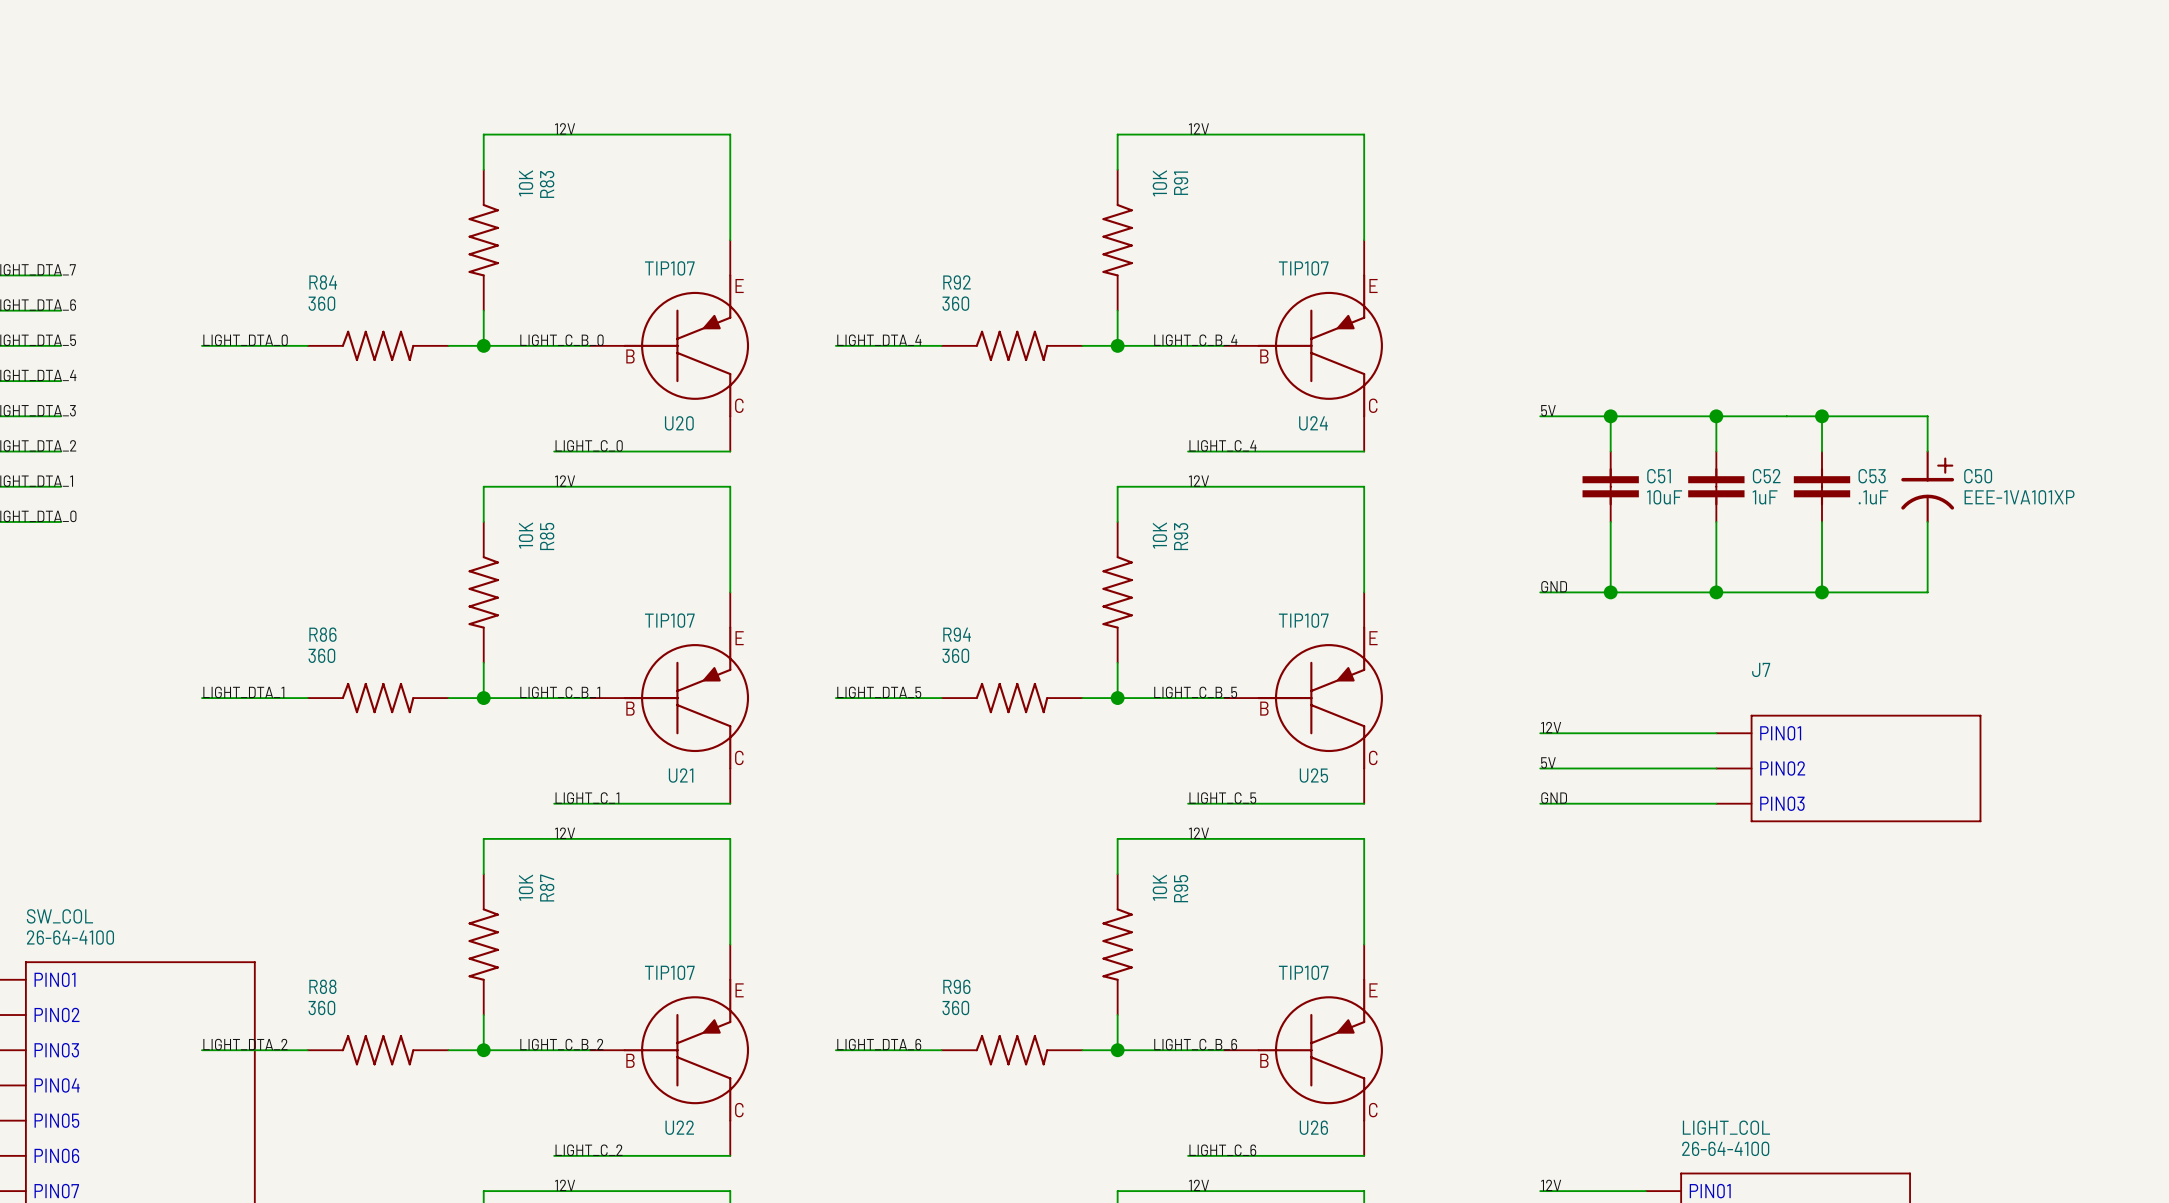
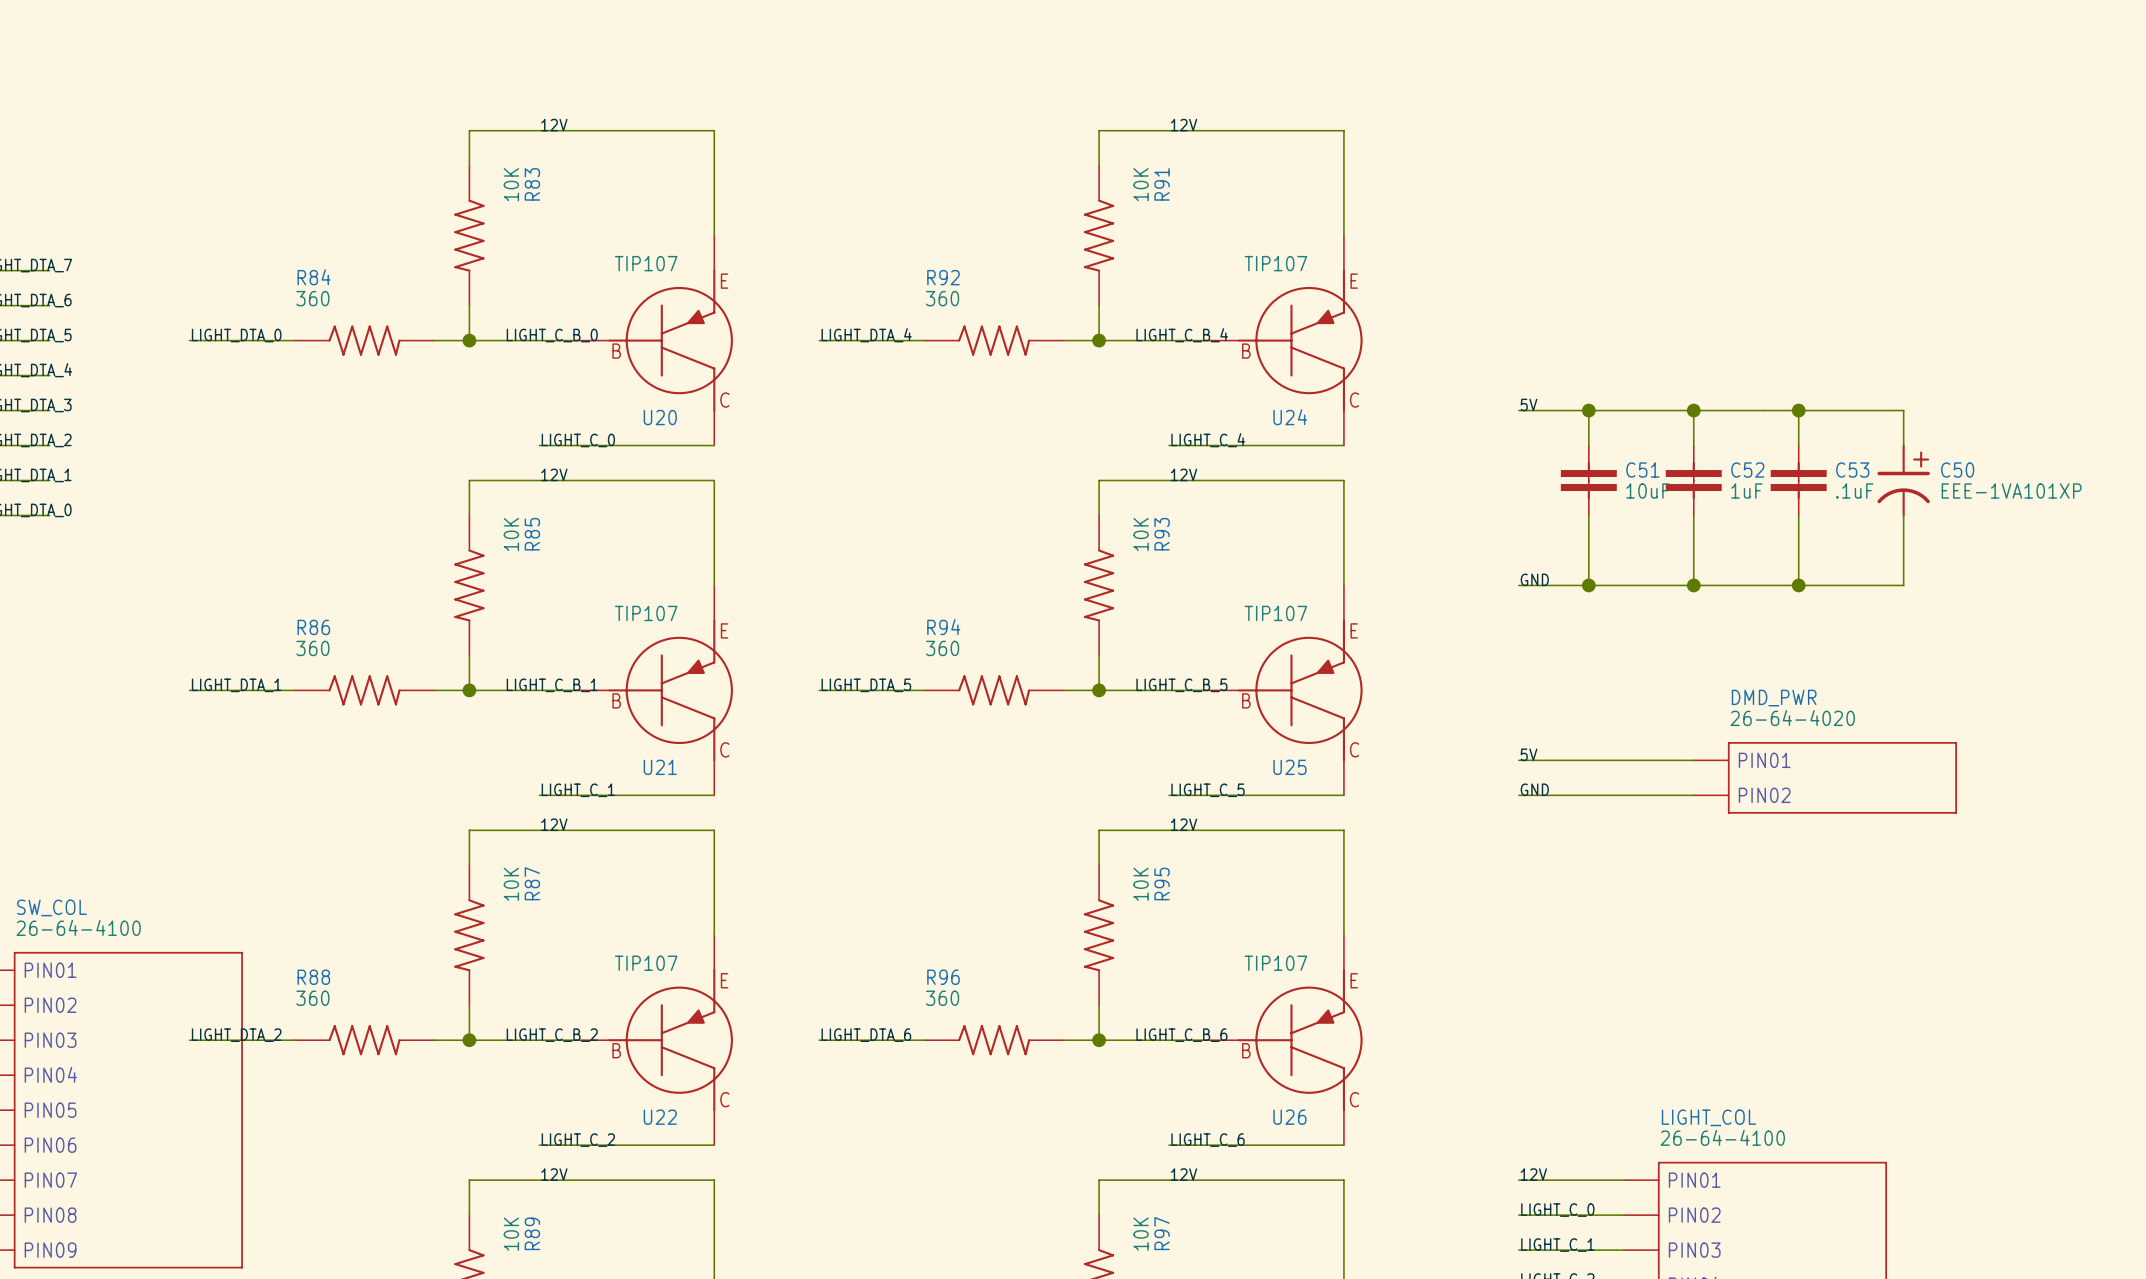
label: 12V (1551, 727) -> none
wire: (1540, 733) (1716, 733) -> none
J7: (1848, 768) -> none
DMD_PWR: none -> 26-64-4020 (1825, 777)

